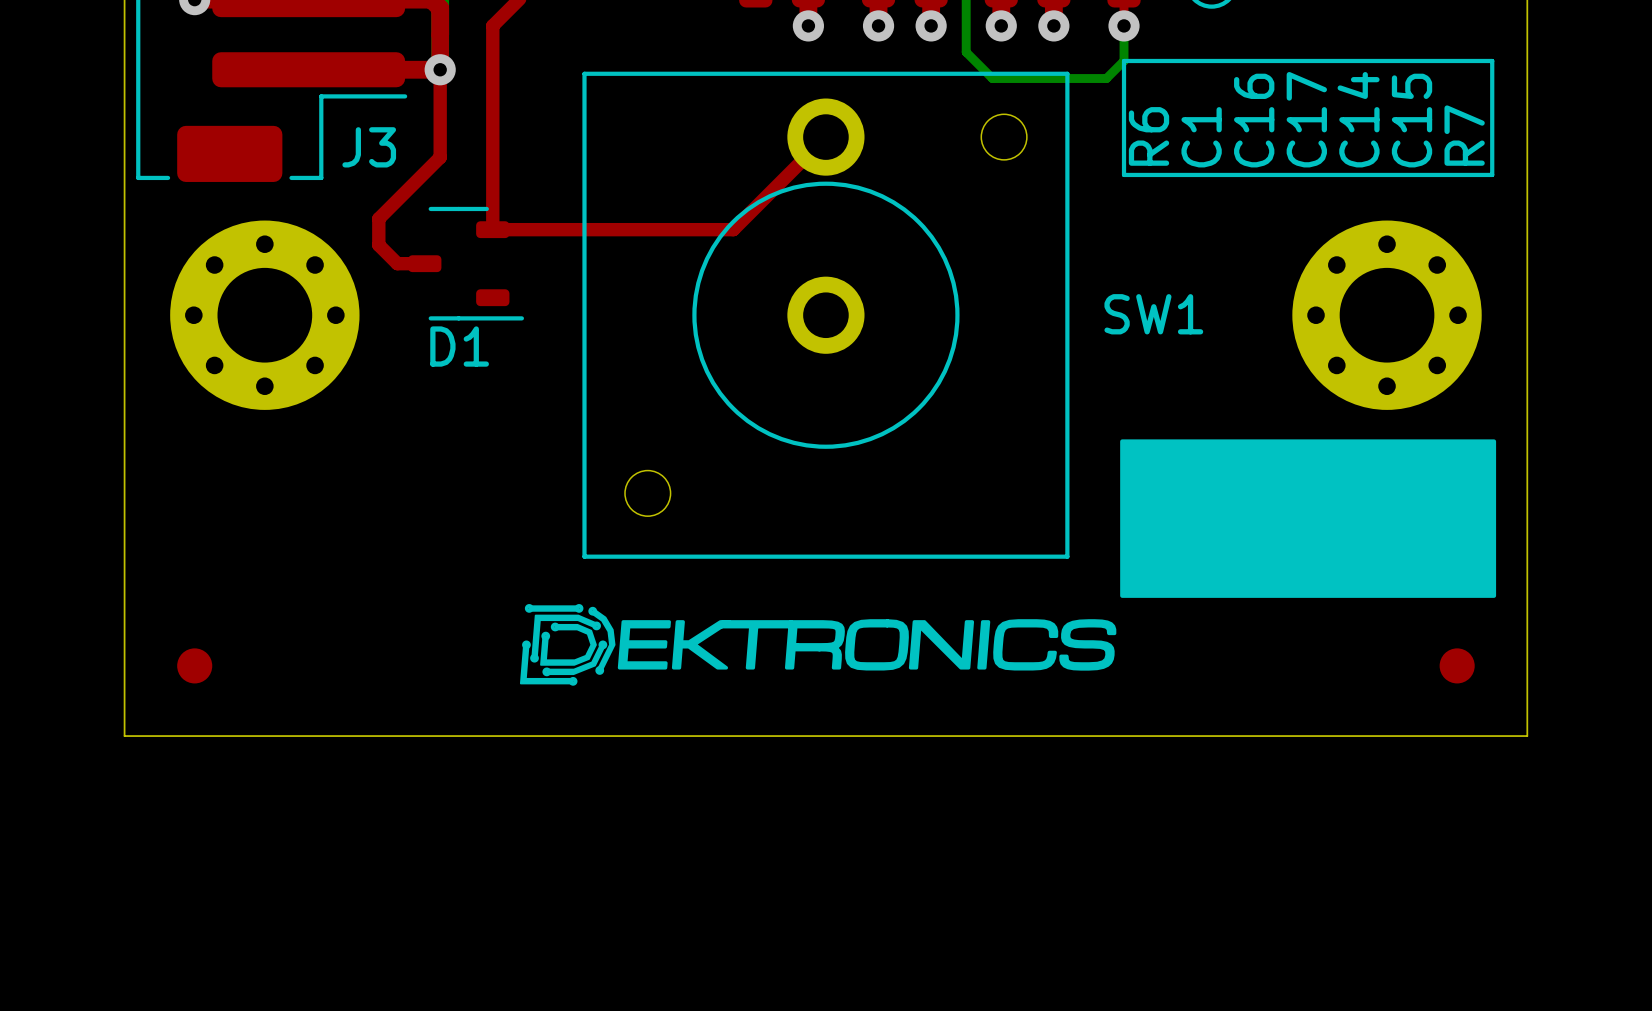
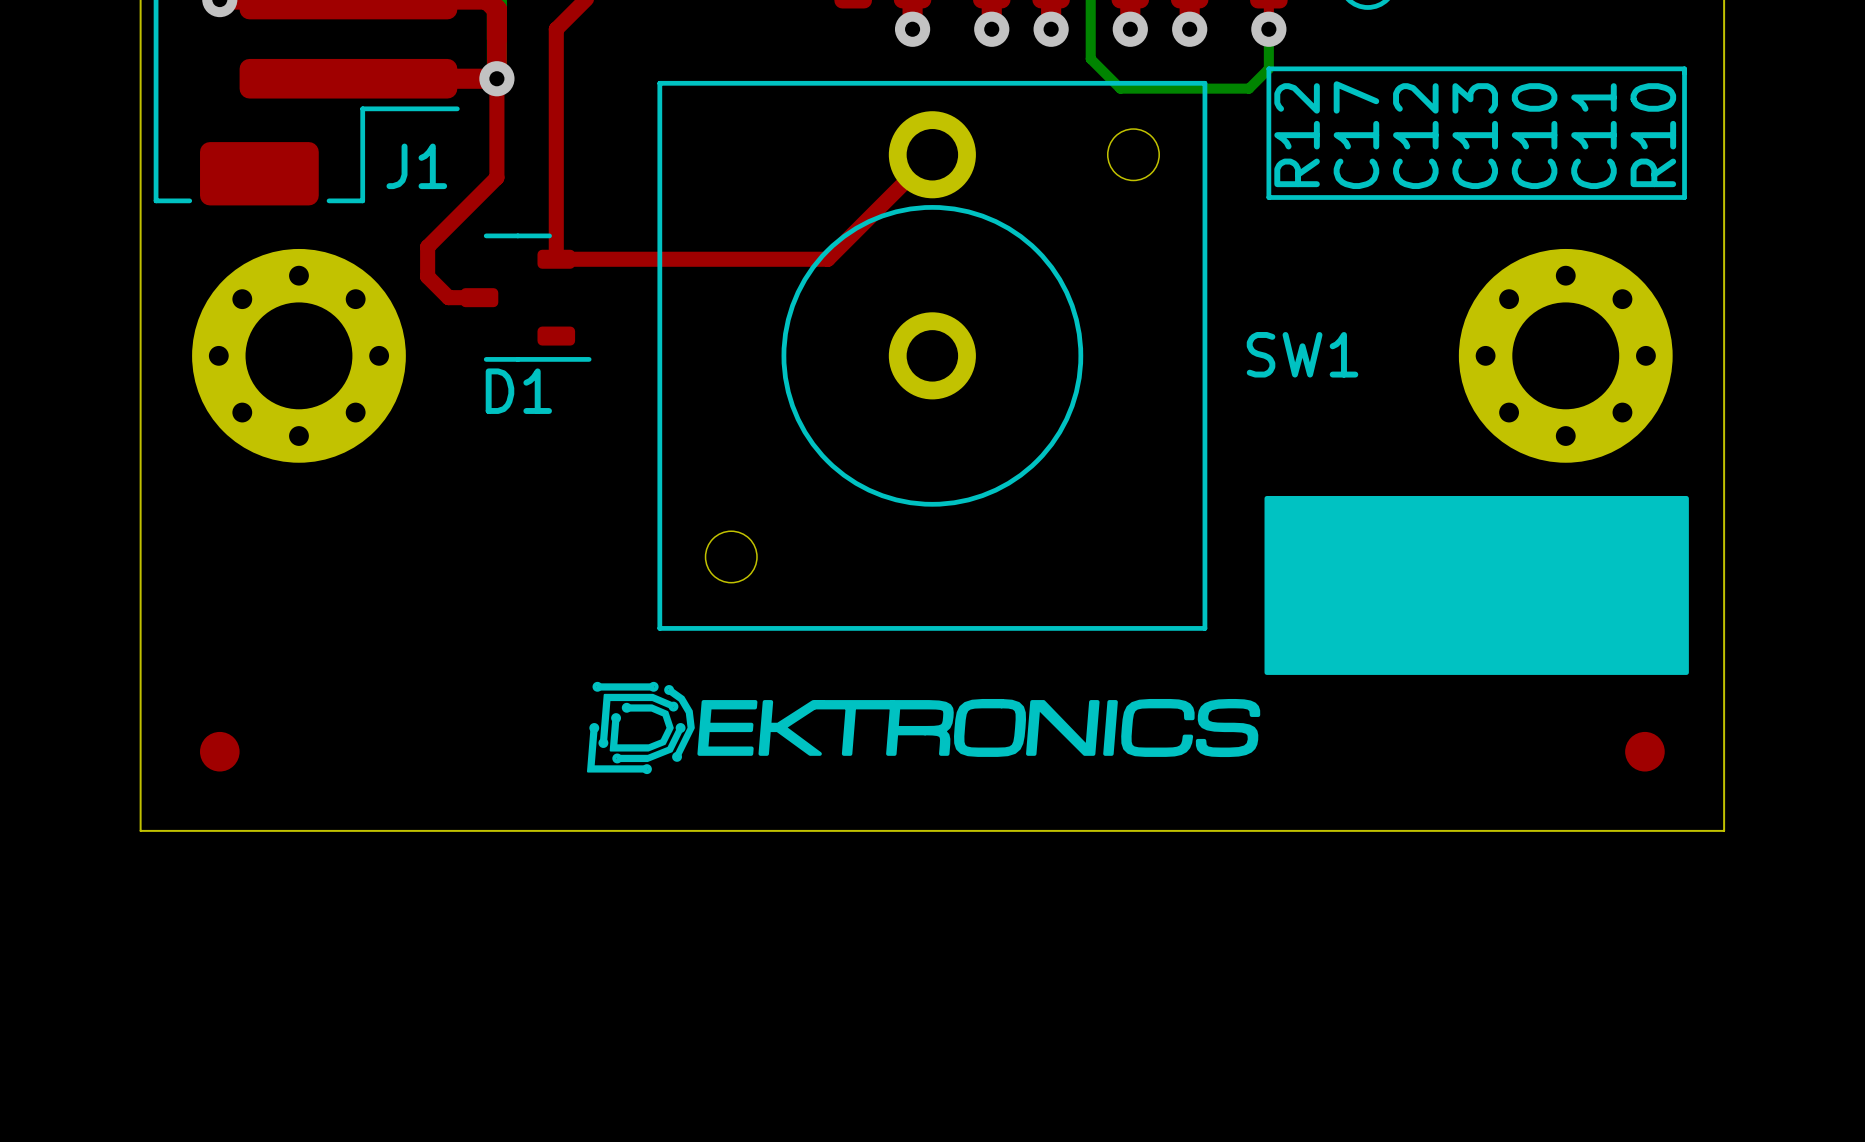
C17 name: C17 (1306, 119) -> C13 (1475, 136)
C14 name: C14 (1358, 119) -> C10 (1534, 136)
C16 name: C16 (1254, 120) -> C12 (1415, 136)
C15 name: C15 (1412, 120) -> C11 (1593, 136)
R7 name: R7 (1464, 135) -> R10 (1653, 135)
R6 name: R6 (1149, 136) -> R12 (1297, 135)
C1 name: C1 (1201, 137) -> C17 (1356, 135)
J3 name: J3 (369, 147) -> J1 (416, 166)

